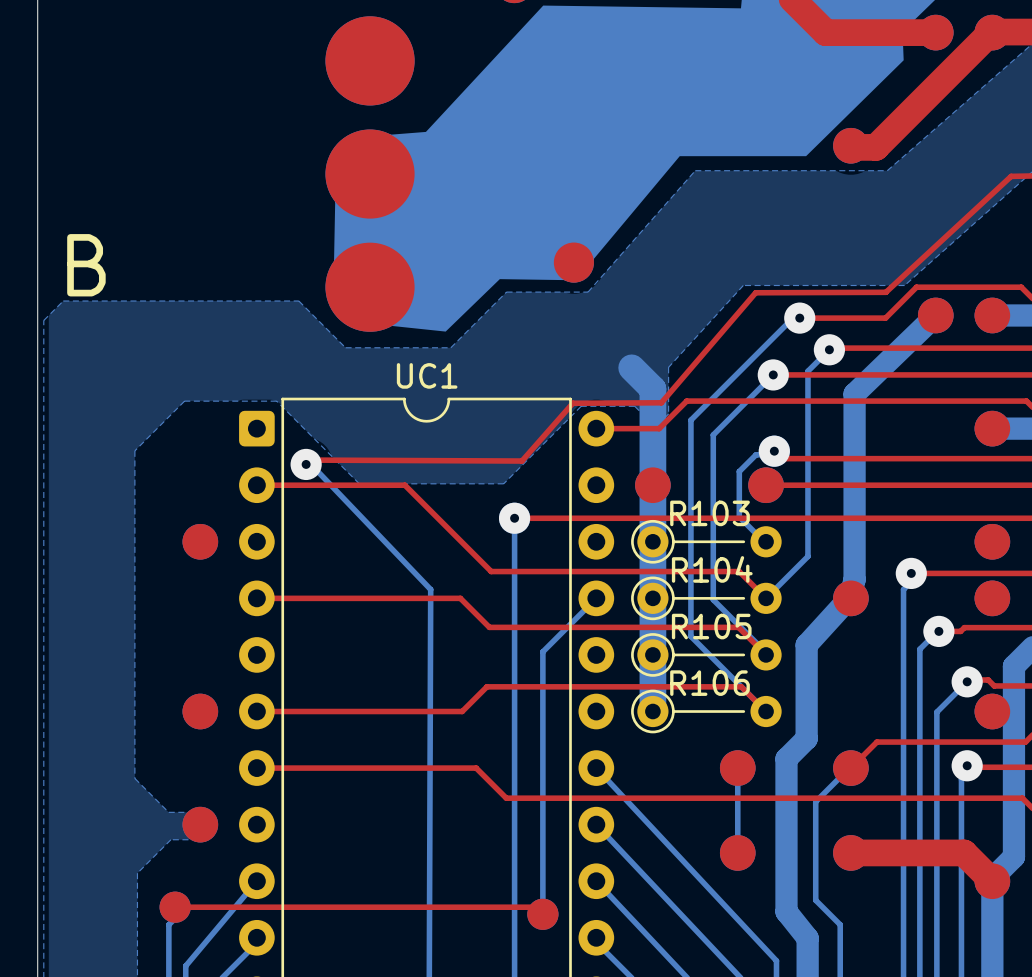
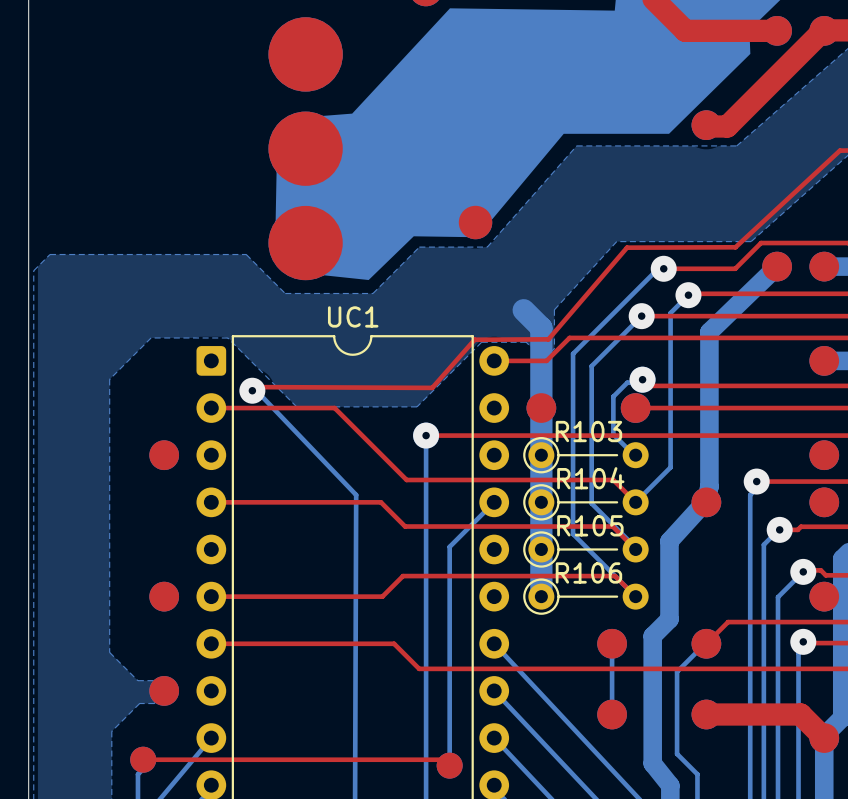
text: B (86, 265) -> none

